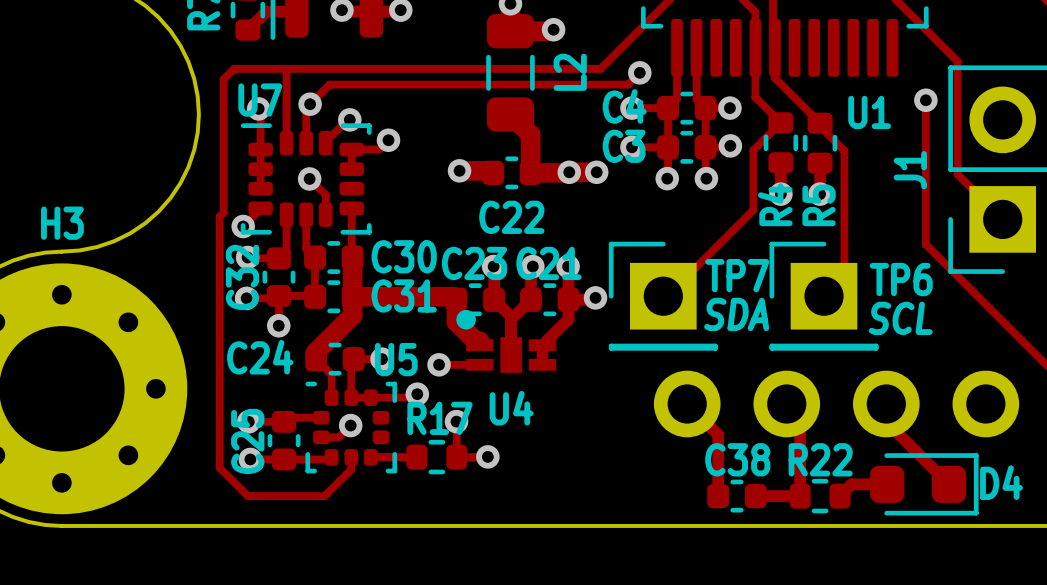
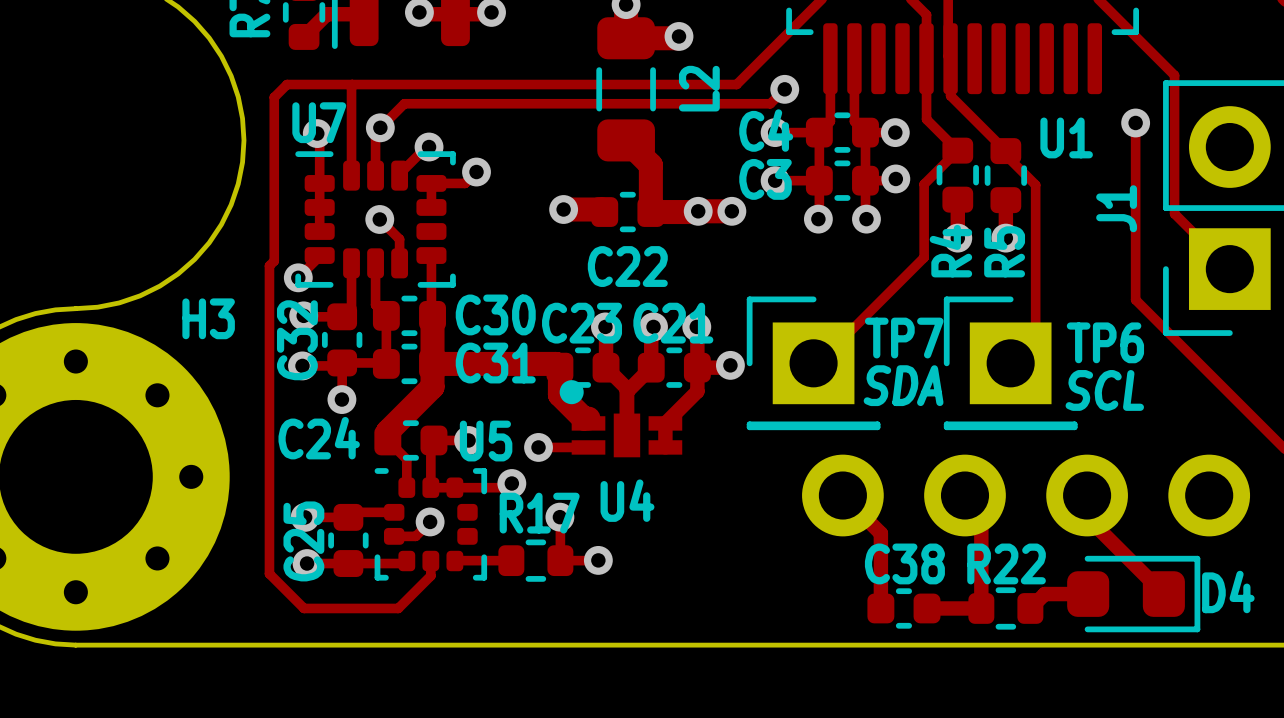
H3 name position: H3 (62, 223) -> H3 (208, 318)

